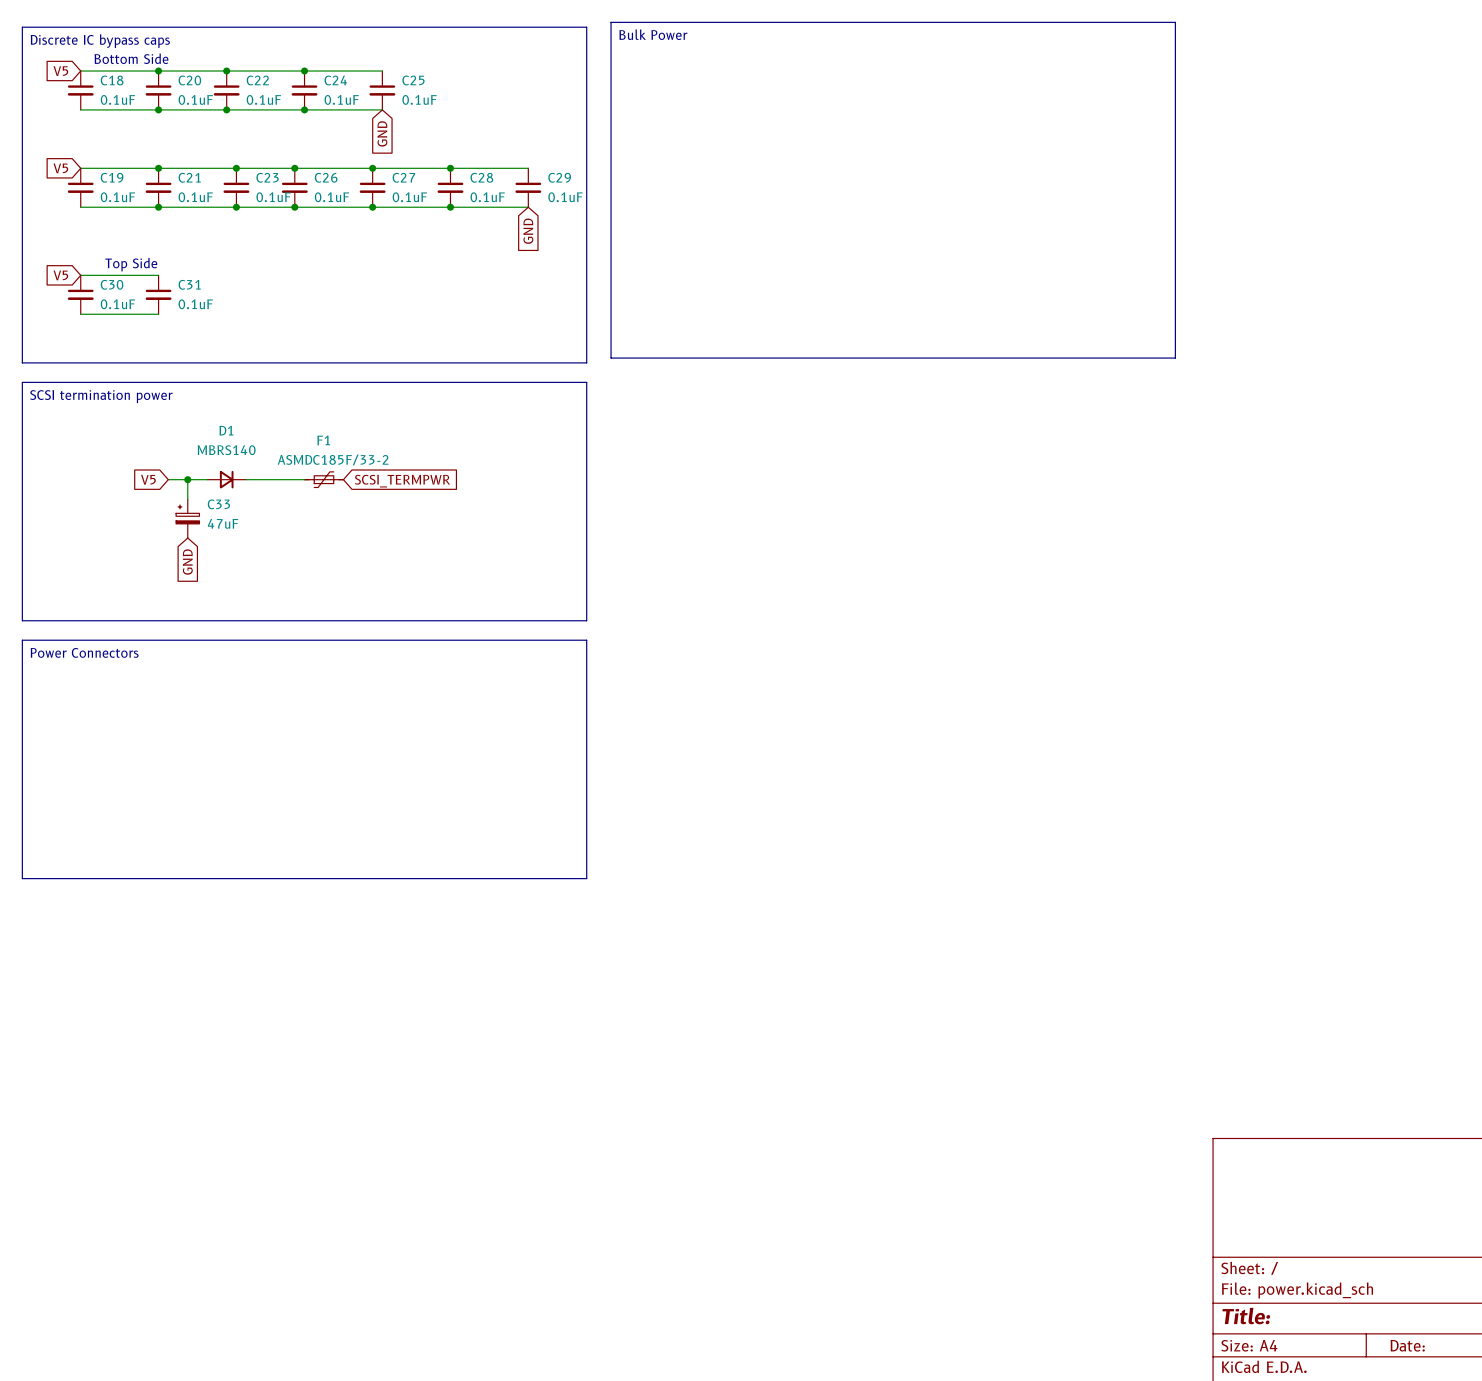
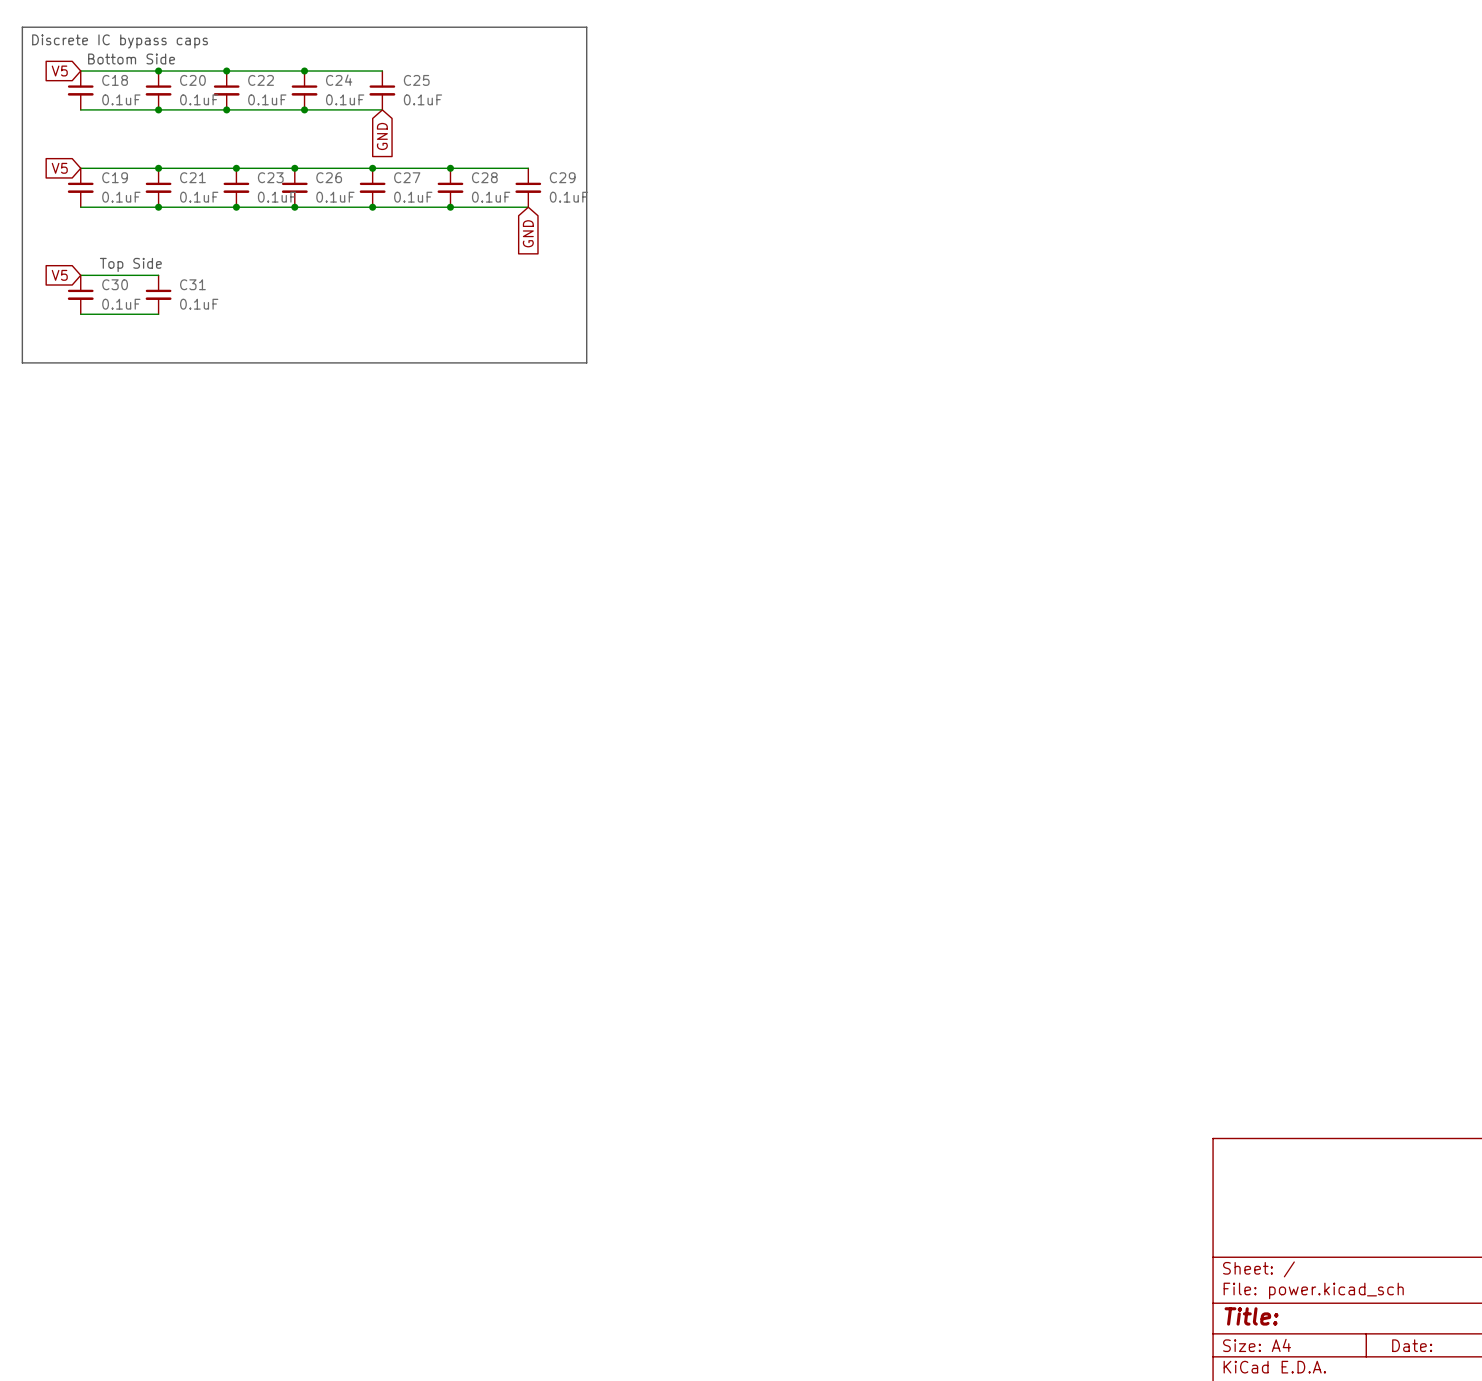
line: (611, 22) (1175, 22) (1175, 358) (611, 358) (611, 22) -> none
text: Bulk Power (653, 34) -> none
line: (22, 382) (586, 382) (586, 620) (22, 620) (22, 382) -> none
text: SCSI termination power (101, 396) -> none
global label: V5 (148, 479) -> none
wire: (168, 479) (207, 479) -> none
wire: (187, 479) (187, 499) -> none
junction: (187, 479) -> none
D1: MBRS140 (226, 479) -> none
wire: (246, 479) (304, 479) -> none
F1: ASMDC185F/33-2 (323, 479) -> none
global label: SCSI_TERMPWR (402, 481) -> none
C33: 47uF (187, 518) -> none
global label: GND (187, 562) -> none
line: (22, 640) (22, 878) (586, 878) (586, 640) (22, 640) -> none
text: Power Connectors (84, 652) -> none

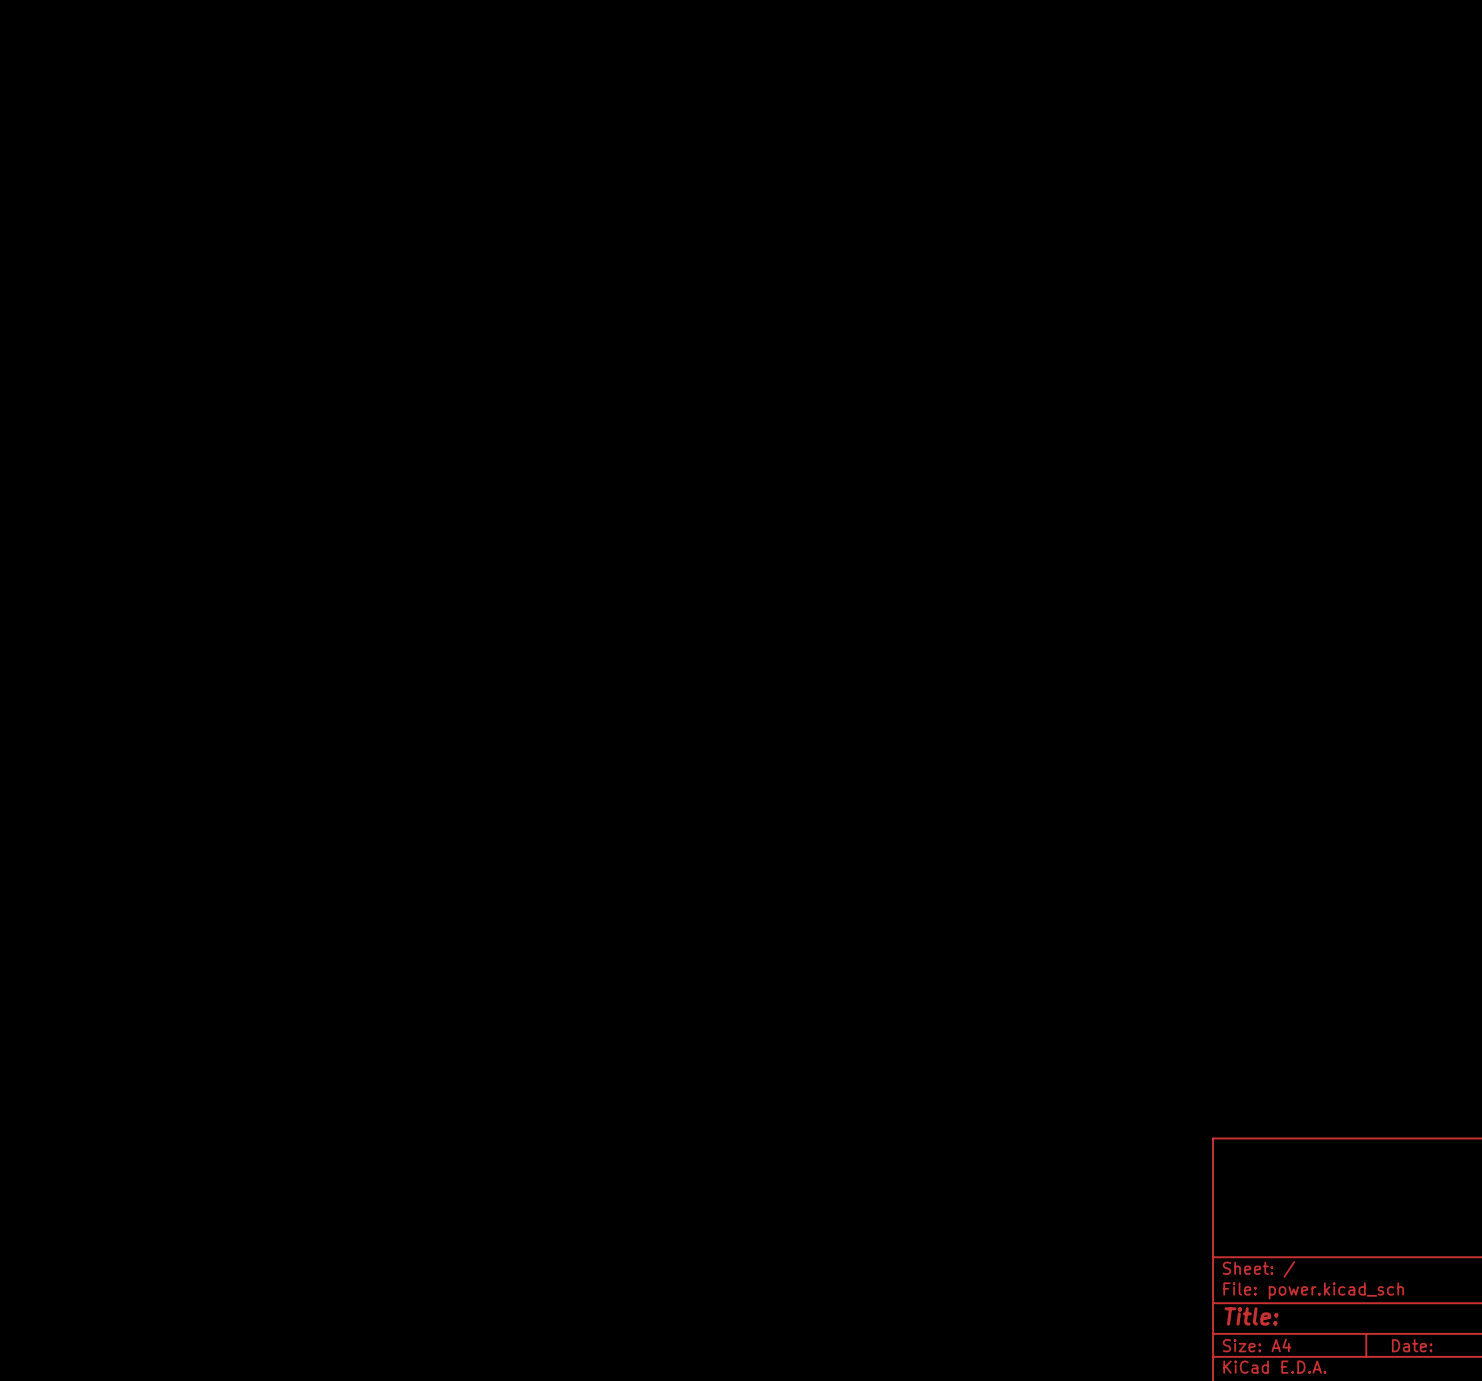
line: (22, 27) (586, 27) (586, 362) (22, 362) (22, 27) -> none
text: Discrete IC bypass caps (120, 41) -> none
text: Bottom Side (131, 58) -> none
global label: V5 (59, 71) -> none
wire: (80, 71) (382, 71) -> none
junction: (158, 71) -> none
junction: (226, 71) -> none
junction: (304, 71) -> none
C18: 0.1uF (80, 90) -> none
C20: 0.1uF (158, 90) -> none
C22: 0.1uF (226, 90) -> none
C24: 0.1uF (304, 90) -> none
C25: 0.1uF (382, 90) -> none
wire: (80, 109) (382, 109) -> none
junction: (158, 109) -> none
junction: (226, 109) -> none
junction: (304, 109) -> none
global label: GND (382, 136) -> none
global label: V5 (59, 168) -> none
wire: (80, 168) (528, 168) -> none
junction: (158, 168) -> none
junction: (236, 168) -> none
junction: (294, 168) -> none
junction: (372, 168) -> none
junction: (450, 168) -> none
C19: 0.1uF (80, 187) -> none
C21: 0.1uF (158, 187) -> none
C23: 0.1uF (236, 187) -> none
C26: 0.1uF (294, 187) -> none
C27: 0.1uF (372, 187) -> none
C28: 0.1uF (450, 187) -> none
C29: 0.1uF (528, 187) -> none
wire: (80, 207) (528, 207) -> none
junction: (158, 207) -> none
junction: (236, 207) -> none
junction: (294, 207) -> none
junction: (372, 207) -> none
junction: (450, 207) -> none
global label: GND (528, 233) -> none
text: Top Side (130, 264) -> none
global label: V5 (59, 275) -> none
wire: (80, 275) (158, 275) -> none
C30: 0.1uF (80, 294) -> none
C31: 0.1uF (158, 294) -> none
wire: (80, 314) (158, 314) -> none

